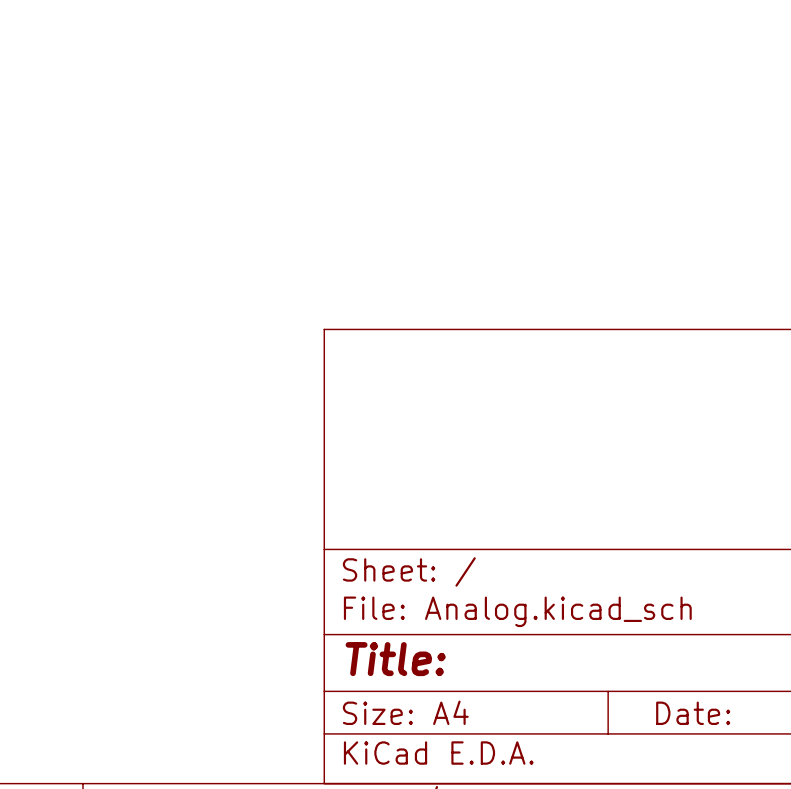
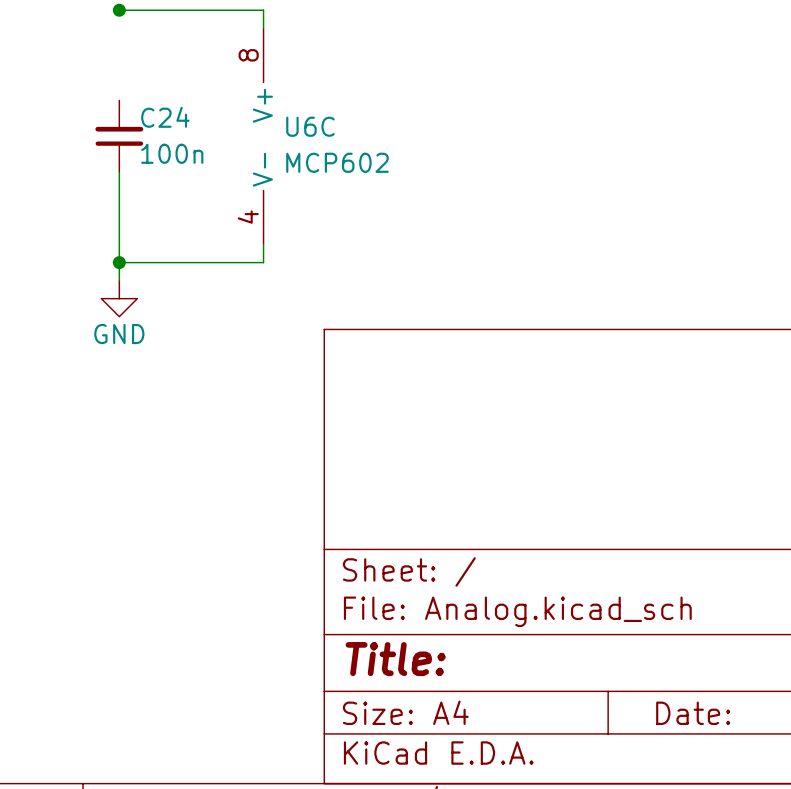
wire: none -> (119, 10) (263, 10) (263, 28)
junction: none -> (119, 10)
C24: none -> 100n (119, 136)
U6C: none -> MCP602 (263, 136)
wire: none -> (119, 172) (119, 280)
wire: none -> (263, 244) (263, 262) (119, 262)
junction: none -> (119, 262)
power symbol: none -> GND (119, 298)

